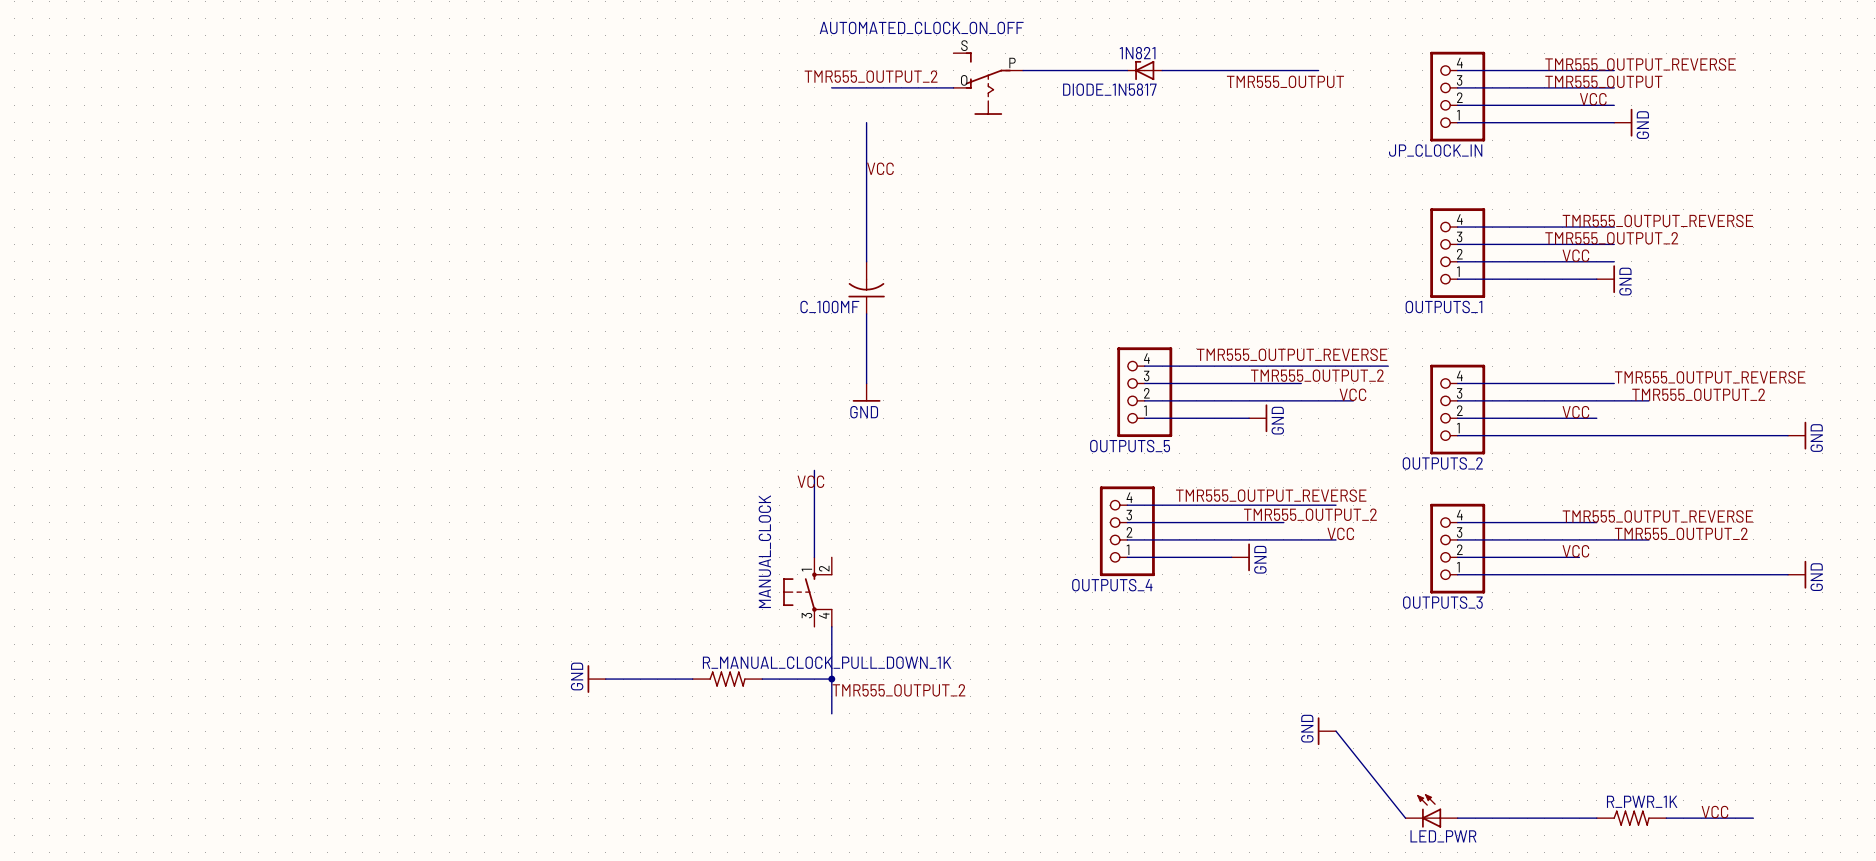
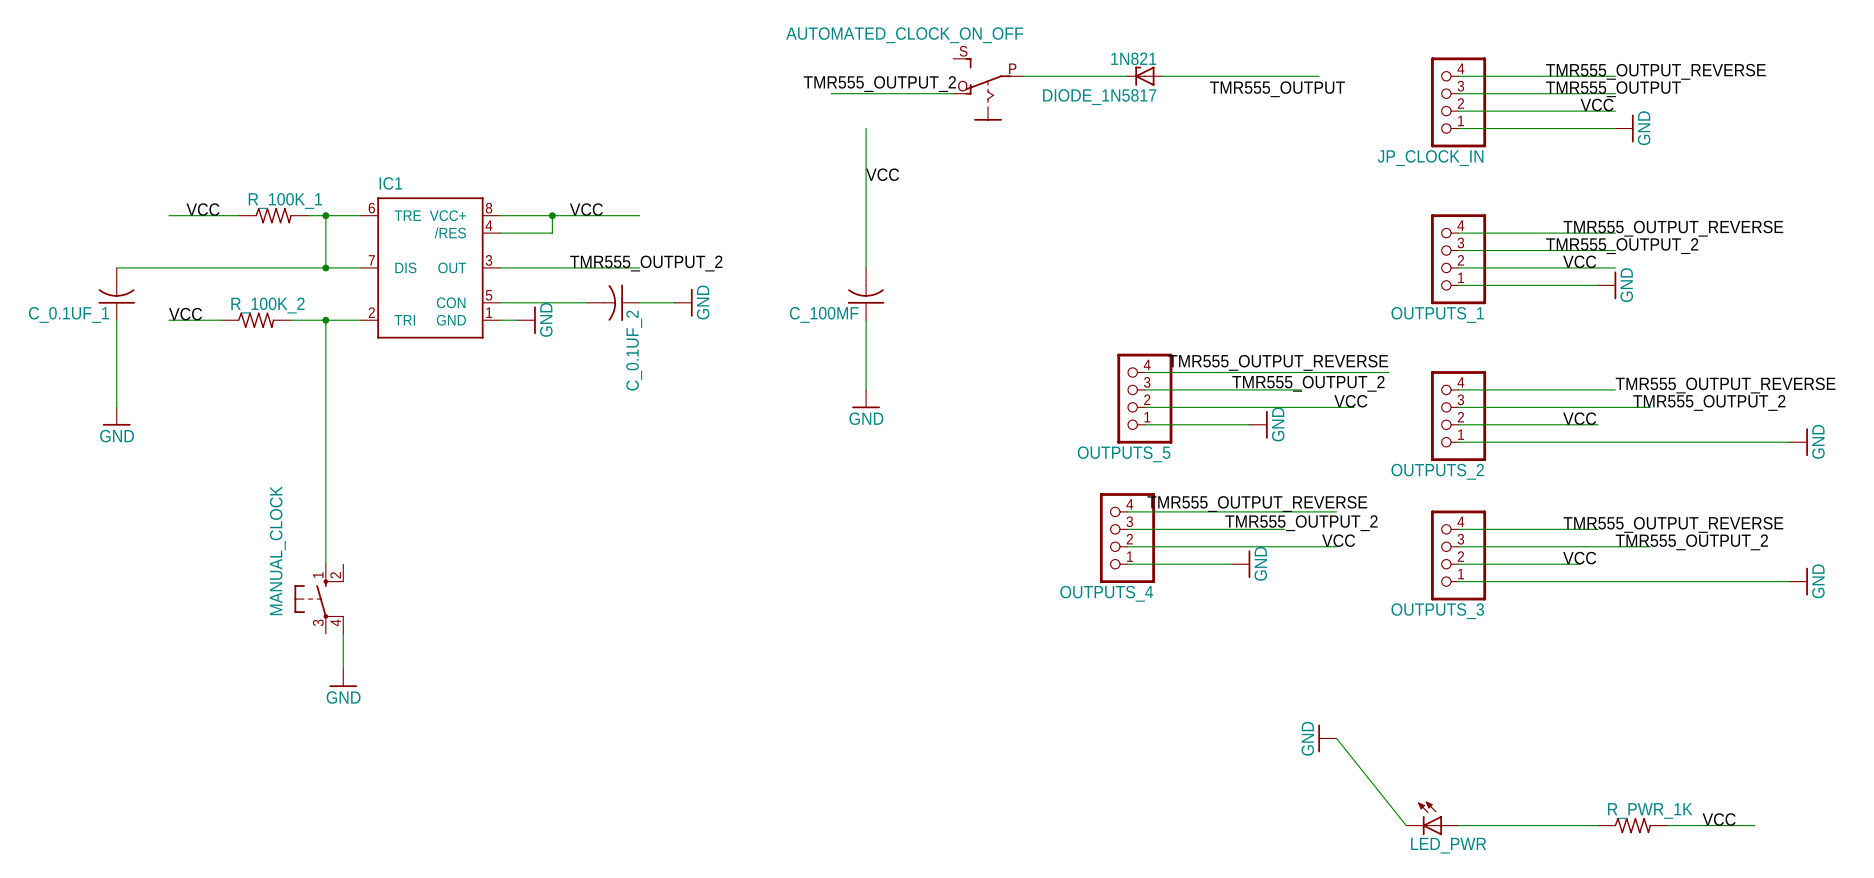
label: none -> VCC (203, 209)
label: none -> VCC (586, 209)
wire: none -> (169, 215) (238, 215)
R_100K_1: none -> (273, 215)
wire: none -> (308, 215) (360, 215)
wire: none -> (325, 215) (325, 267)
junction: none -> (325, 215)
wire: none -> (500, 215) (639, 215)
wire: none -> (552, 215) (552, 233) (500, 233)
junction: none -> (552, 215)
label: none -> TMR555_OUTPUT_2 (646, 263)
wire: none -> (116, 267) (360, 267)
junction: none -> (325, 267)
IC1: none -> (430, 267)
wire: none -> (500, 267) (639, 267)
C_0.1UF_1: none -> (116, 294)
wire: none -> (500, 302) (587, 302)
C_0.1UF_2: none -> (613, 302)
wire: none -> (639, 302) (674, 302)
power symbol: none -> GND (683, 302)
label: none -> VCC (185, 314)
wire: none -> (116, 320) (116, 407)
wire: none -> (169, 320) (221, 320)
R_100K_2: none -> (256, 320)
wire: none -> (290, 320) (360, 320)
wire: none -> (325, 320) (325, 564)
junction: none -> (325, 320)
wire: none -> (500, 320) (517, 320)
power symbol: none -> GND (526, 320)
power symbol: none -> GND (116, 416)
wire: (814, 470) (814, 557) -> none
label: VCC (810, 481) -> none
MANUAL_CLOCK: none -> (319, 599)
MANUAL_CLOCK: (807, 592) -> none
wire: none -> (343, 633) (343, 668)
wire: (831, 626) (831, 713) -> none
power symbol: none -> GND (343, 677)
power symbol: GND (596, 679) -> none
wire: (605, 679) (692, 679) -> none
R_MANUAL_CLOCK_PULL_DOWN_1K: (727, 679) -> none
wire: (762, 679) (831, 679) -> none
junction: (831, 679) -> none
label: TMR555_OUTPUT_2 (898, 690) -> none

